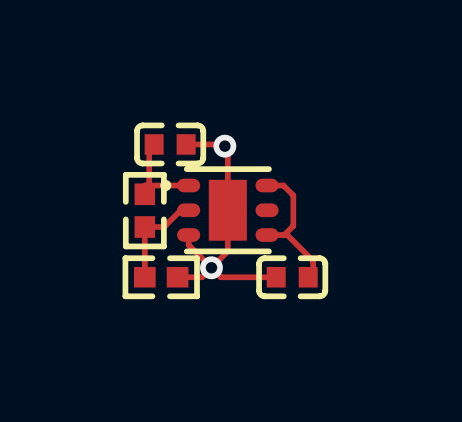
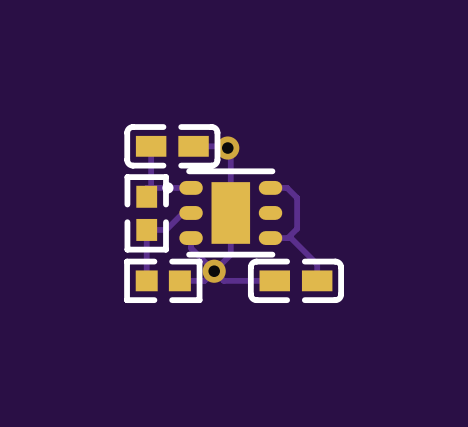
part footprint: [134, 122, 207, 167] -> [124, 124, 221, 169]
part footprint: [256, 255, 329, 300] -> [247, 258, 344, 304]

